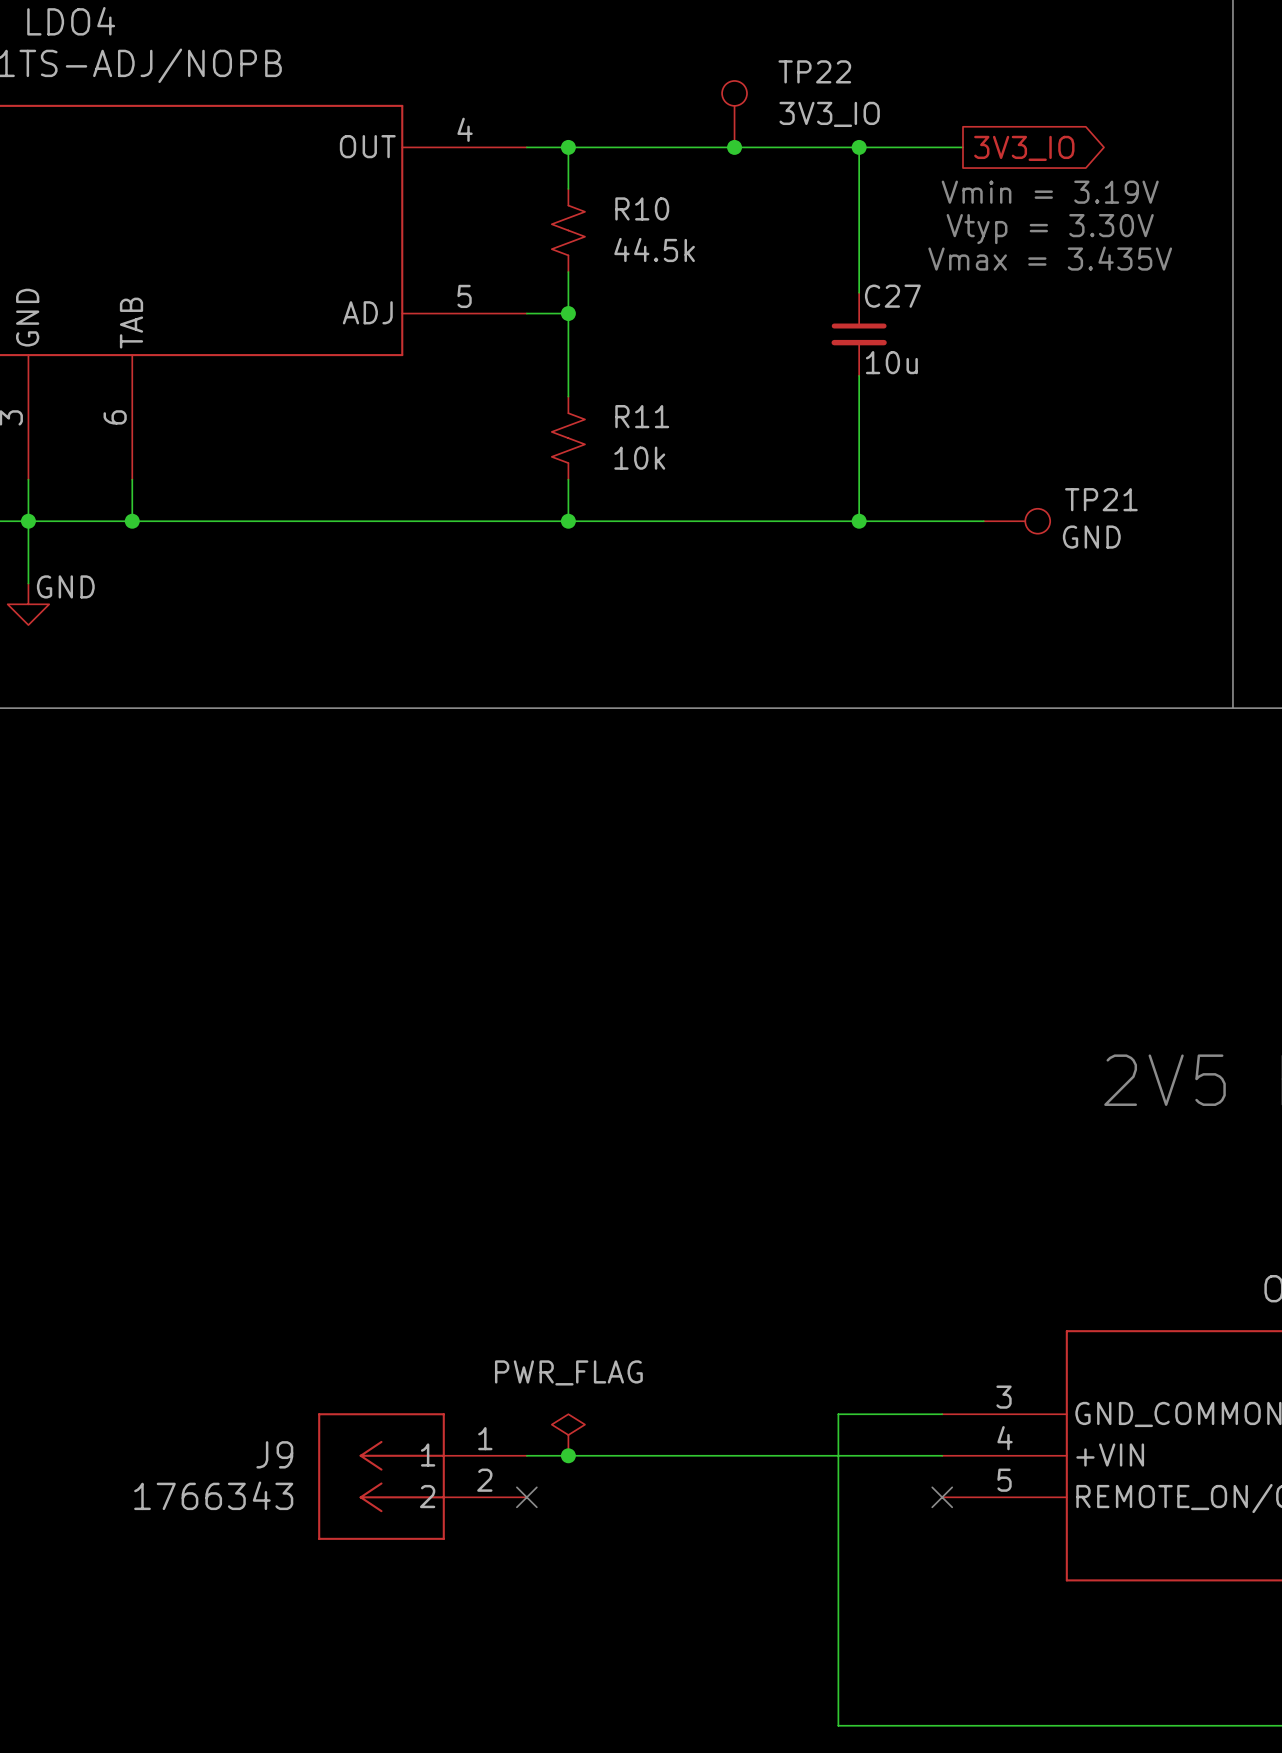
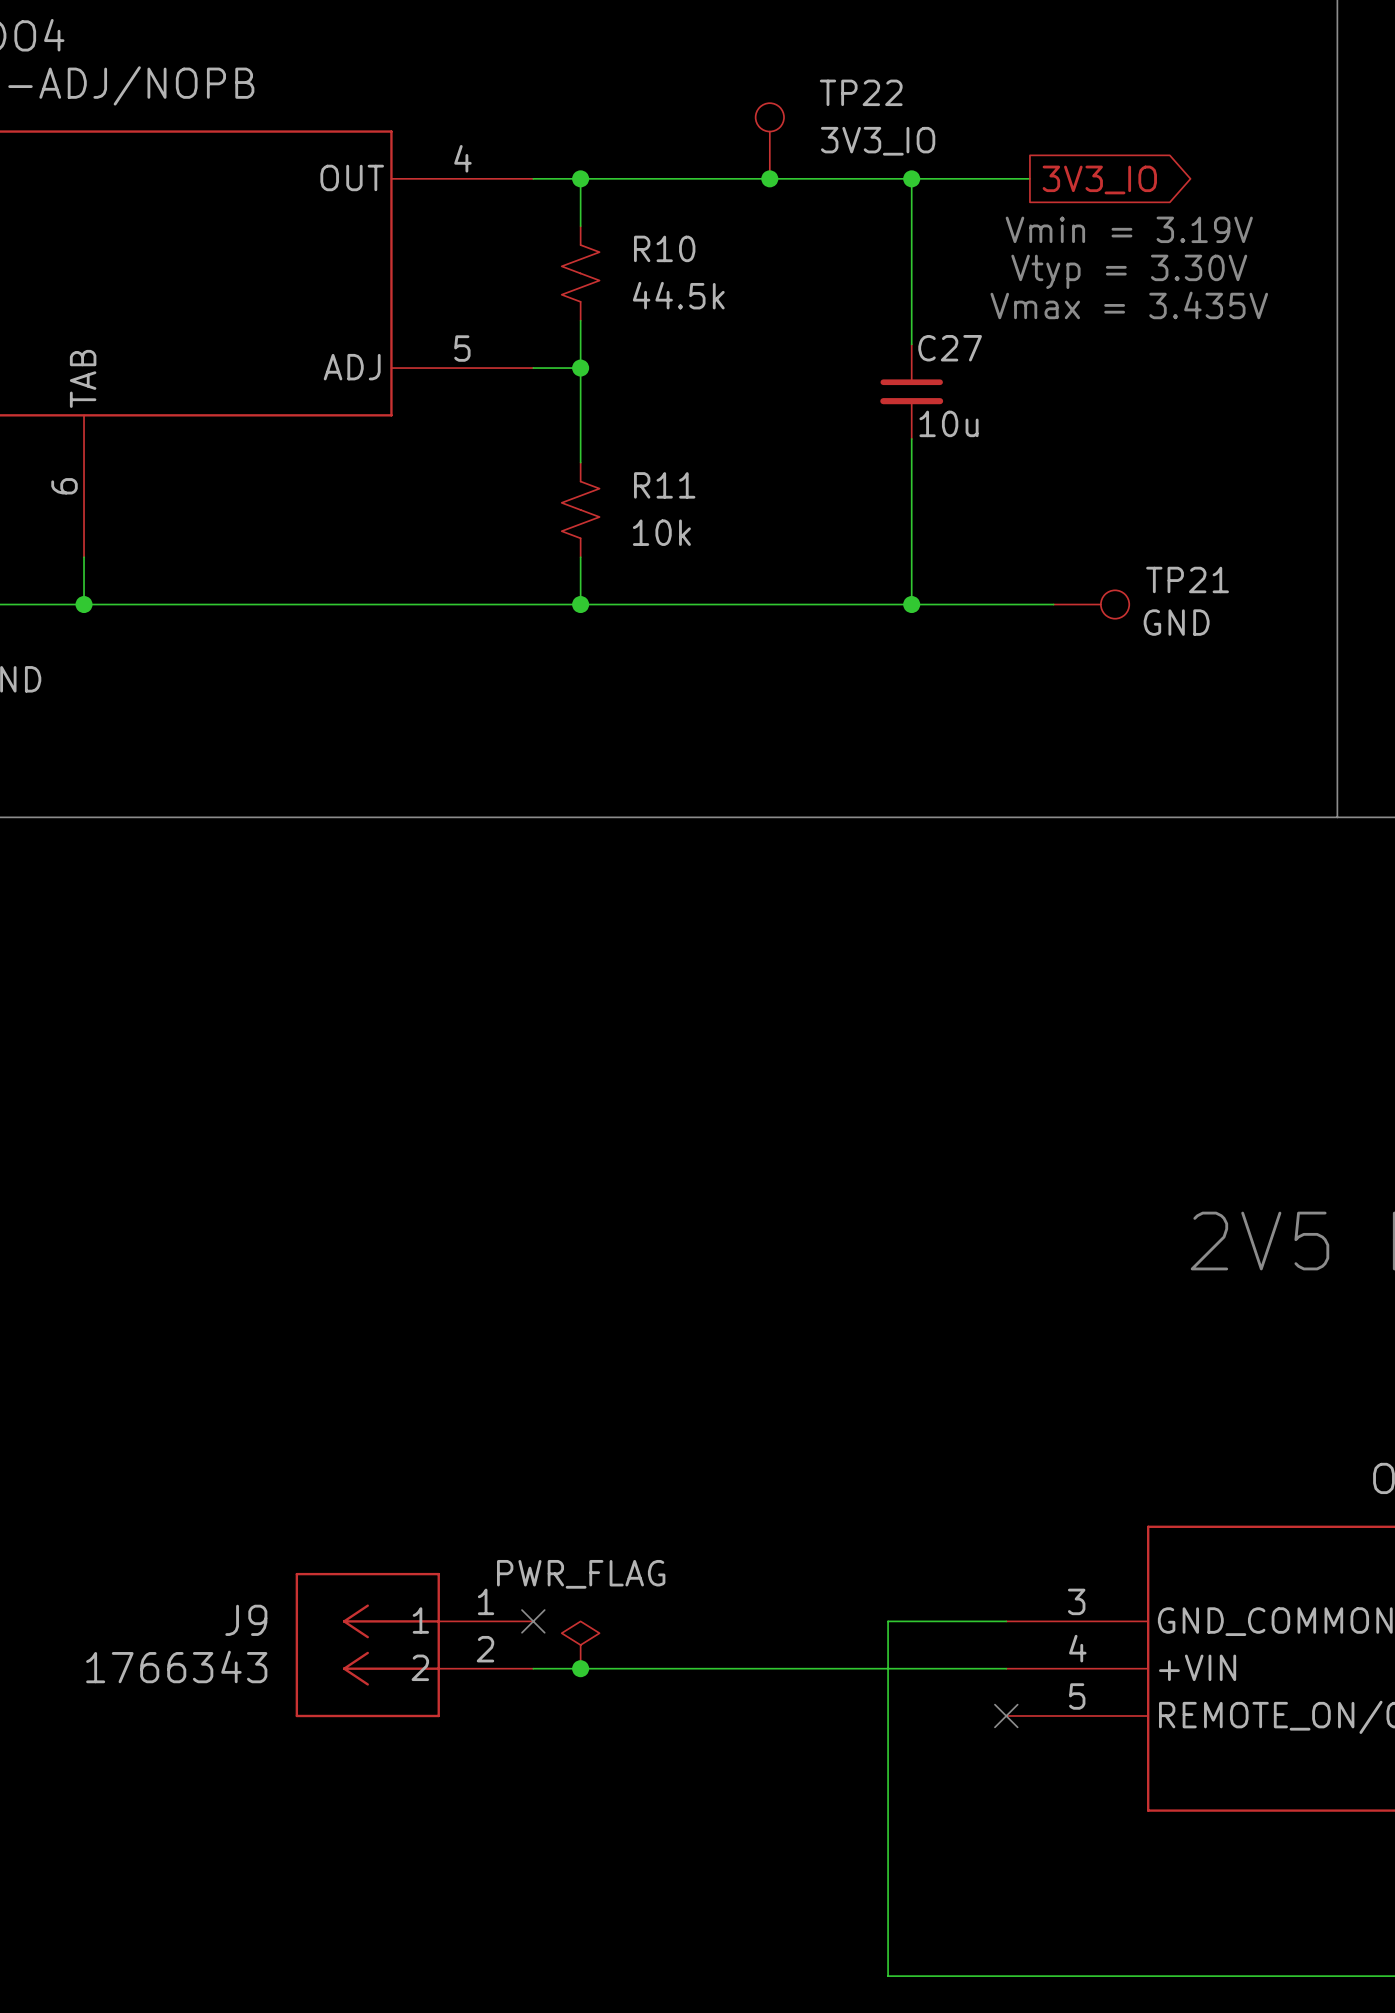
J9 position: (422, 1476) -> (414, 1645)
no-connect mark position: (526, 1497) -> (533, 1621)

